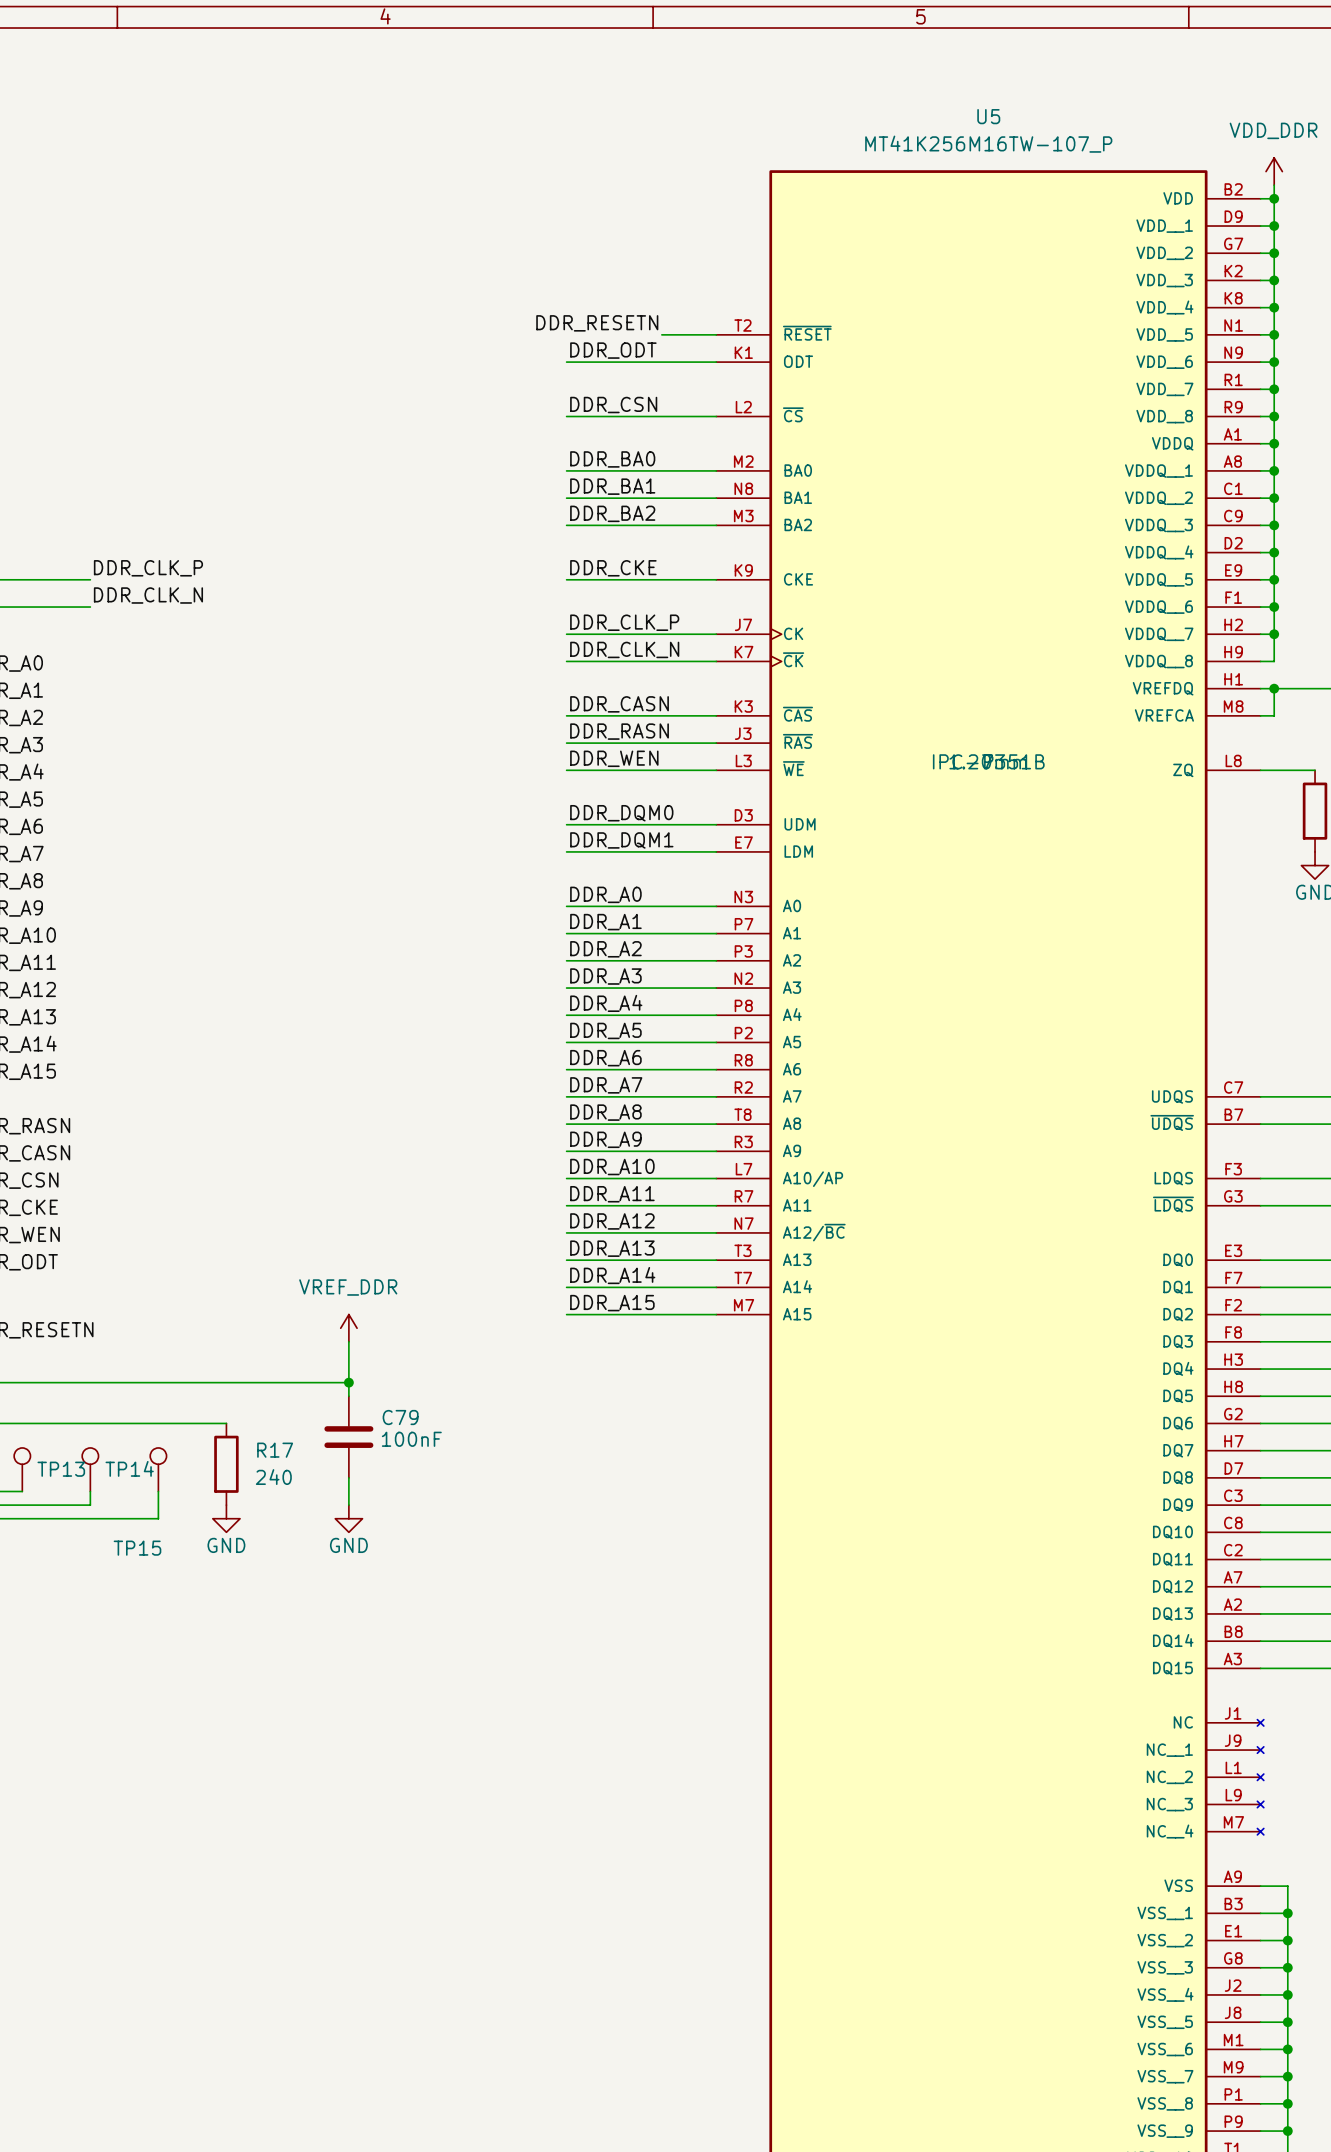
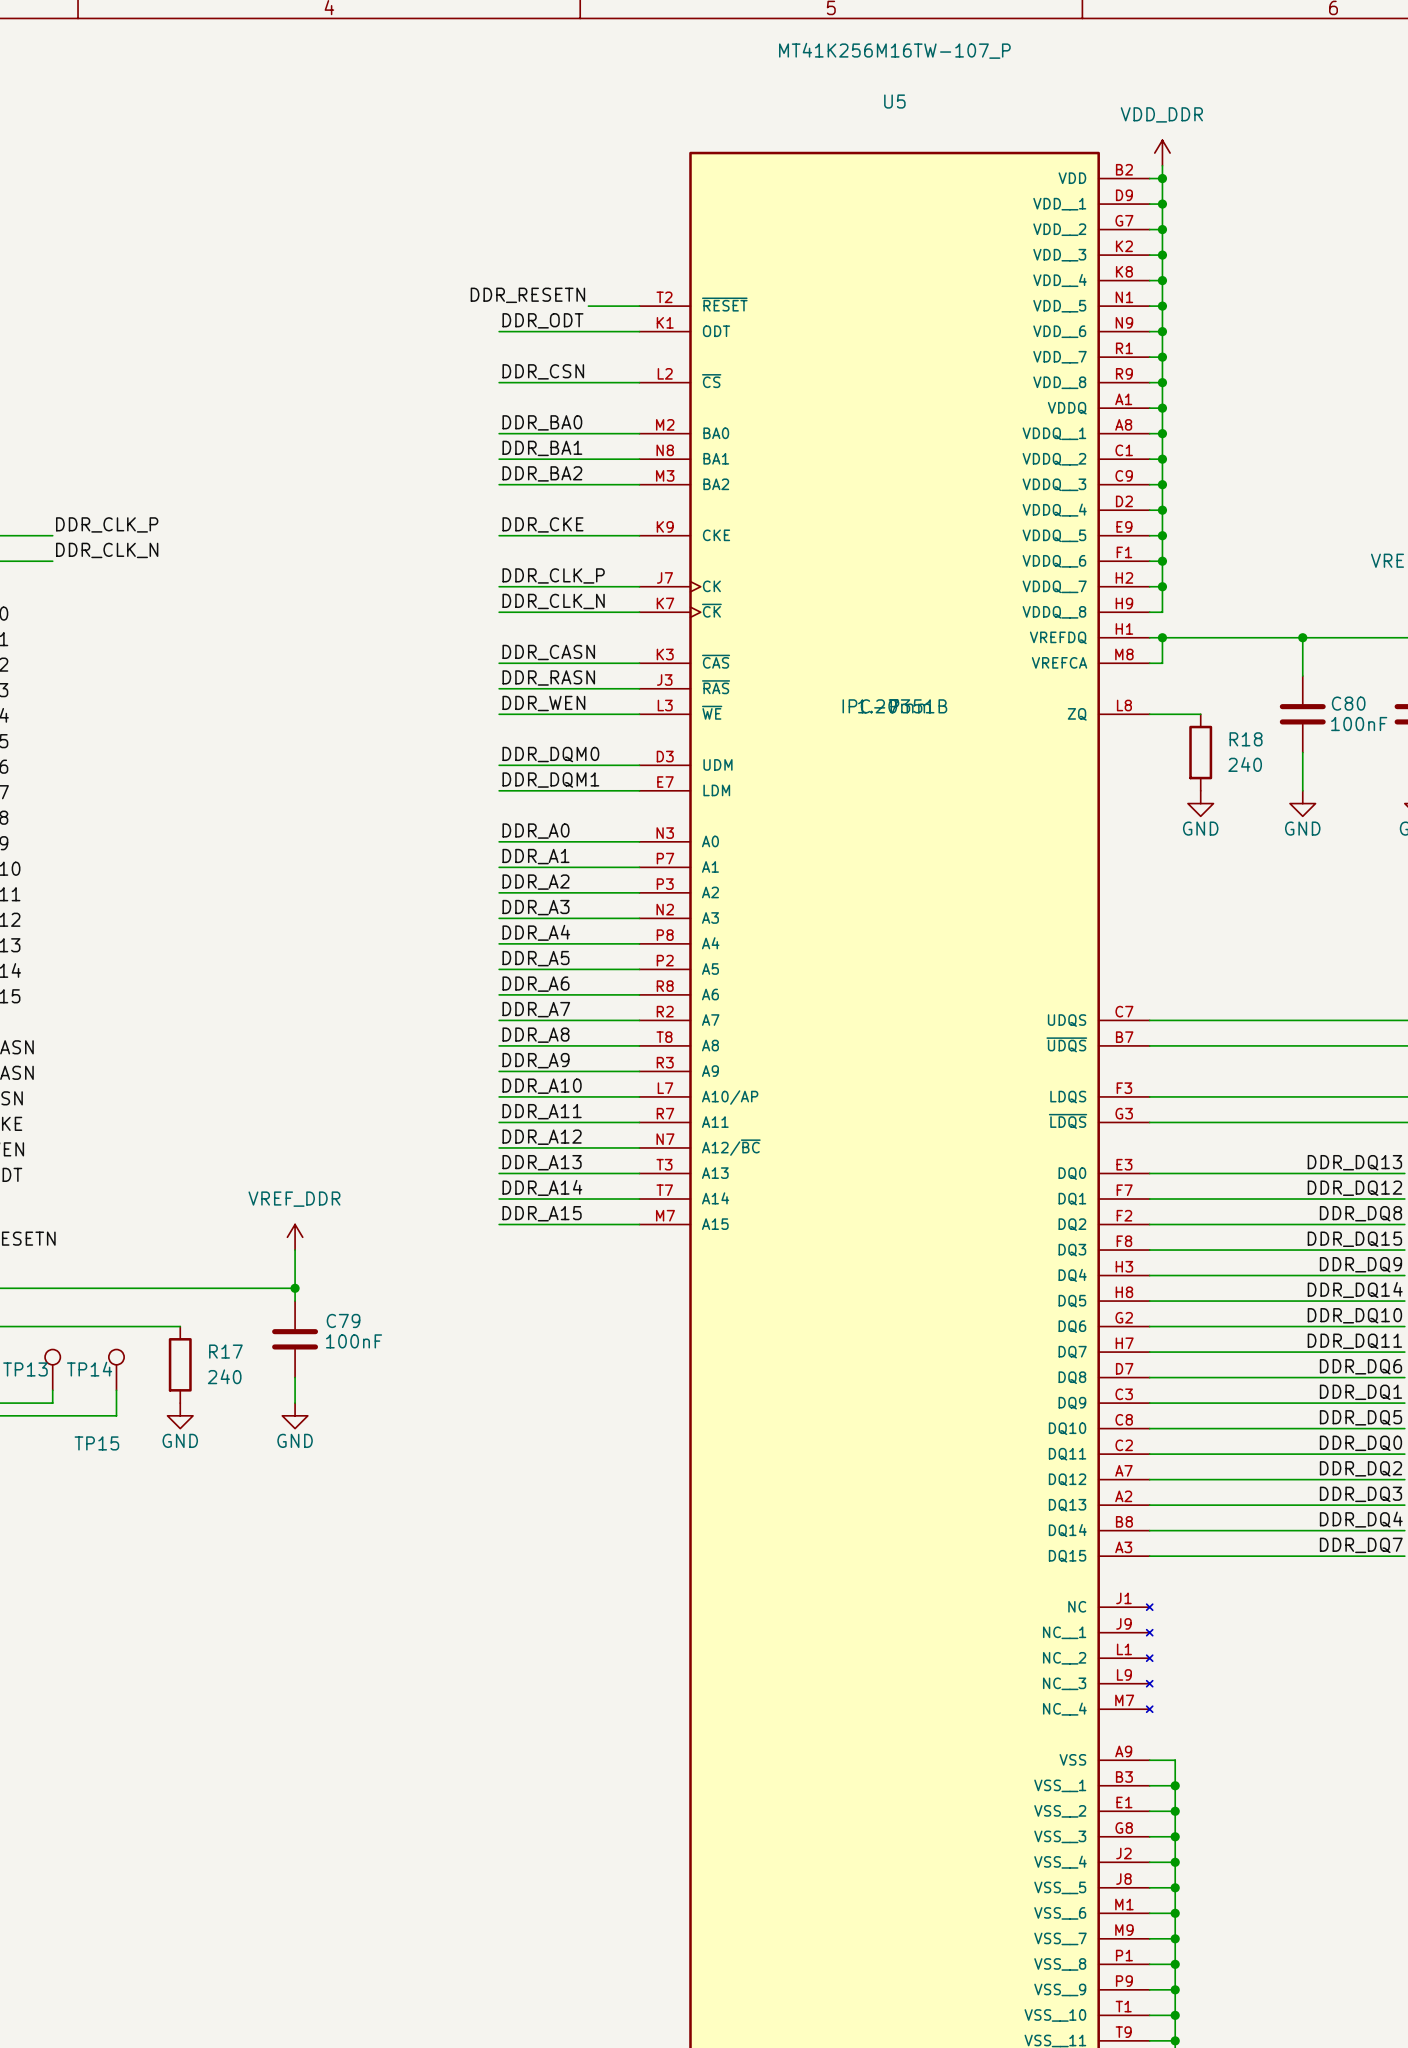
U5 value position: MT41K256M16TW-107_P (988, 144) -> MT41K256M16TW-107_P (894, 50)

